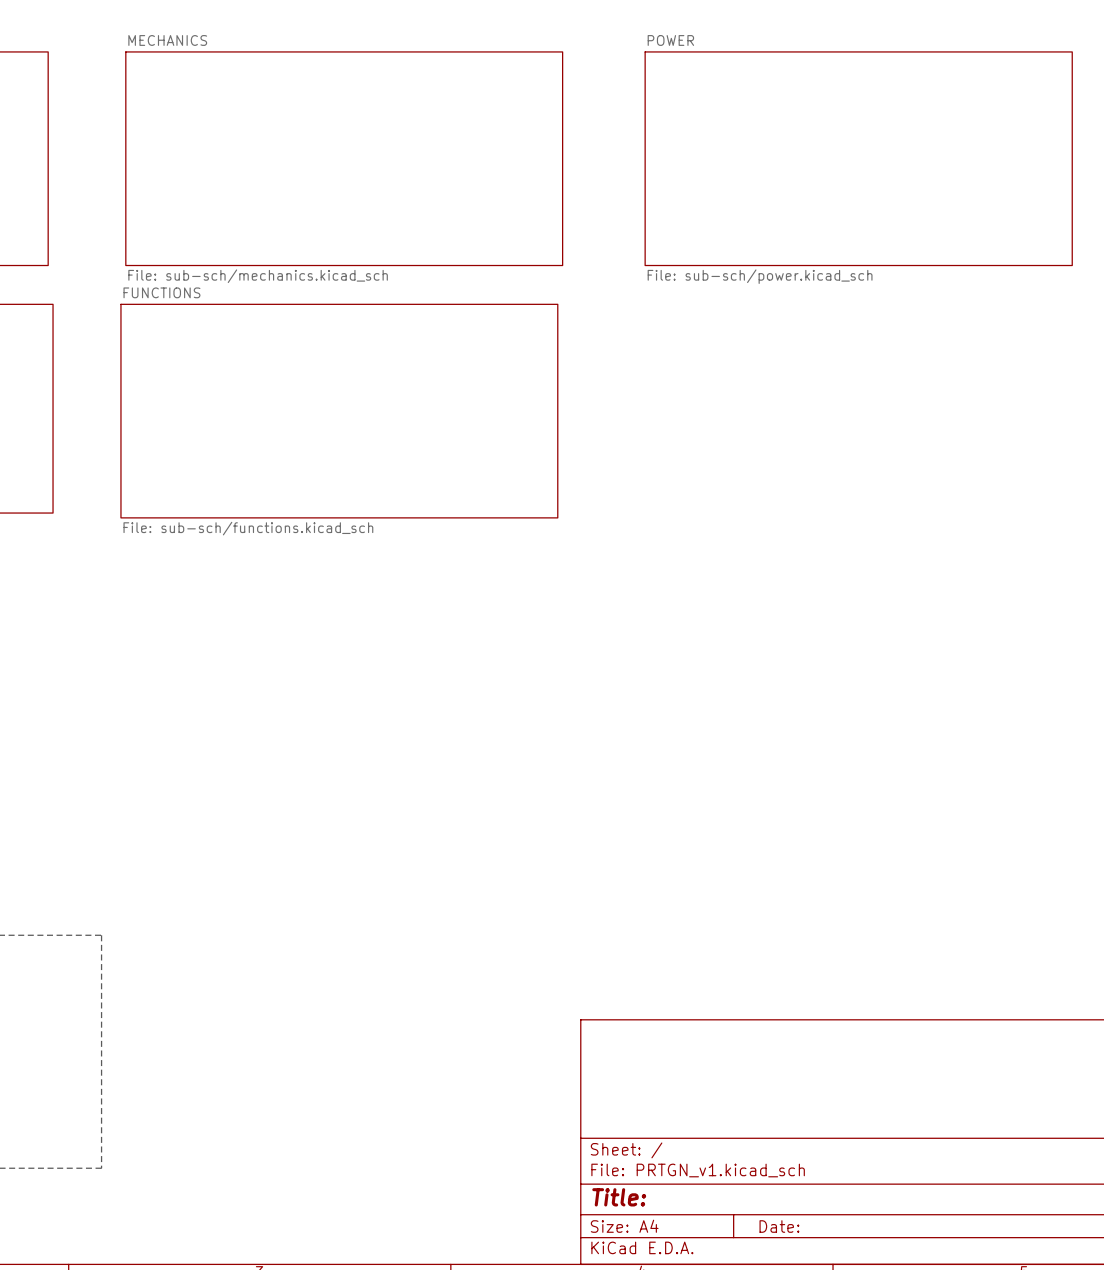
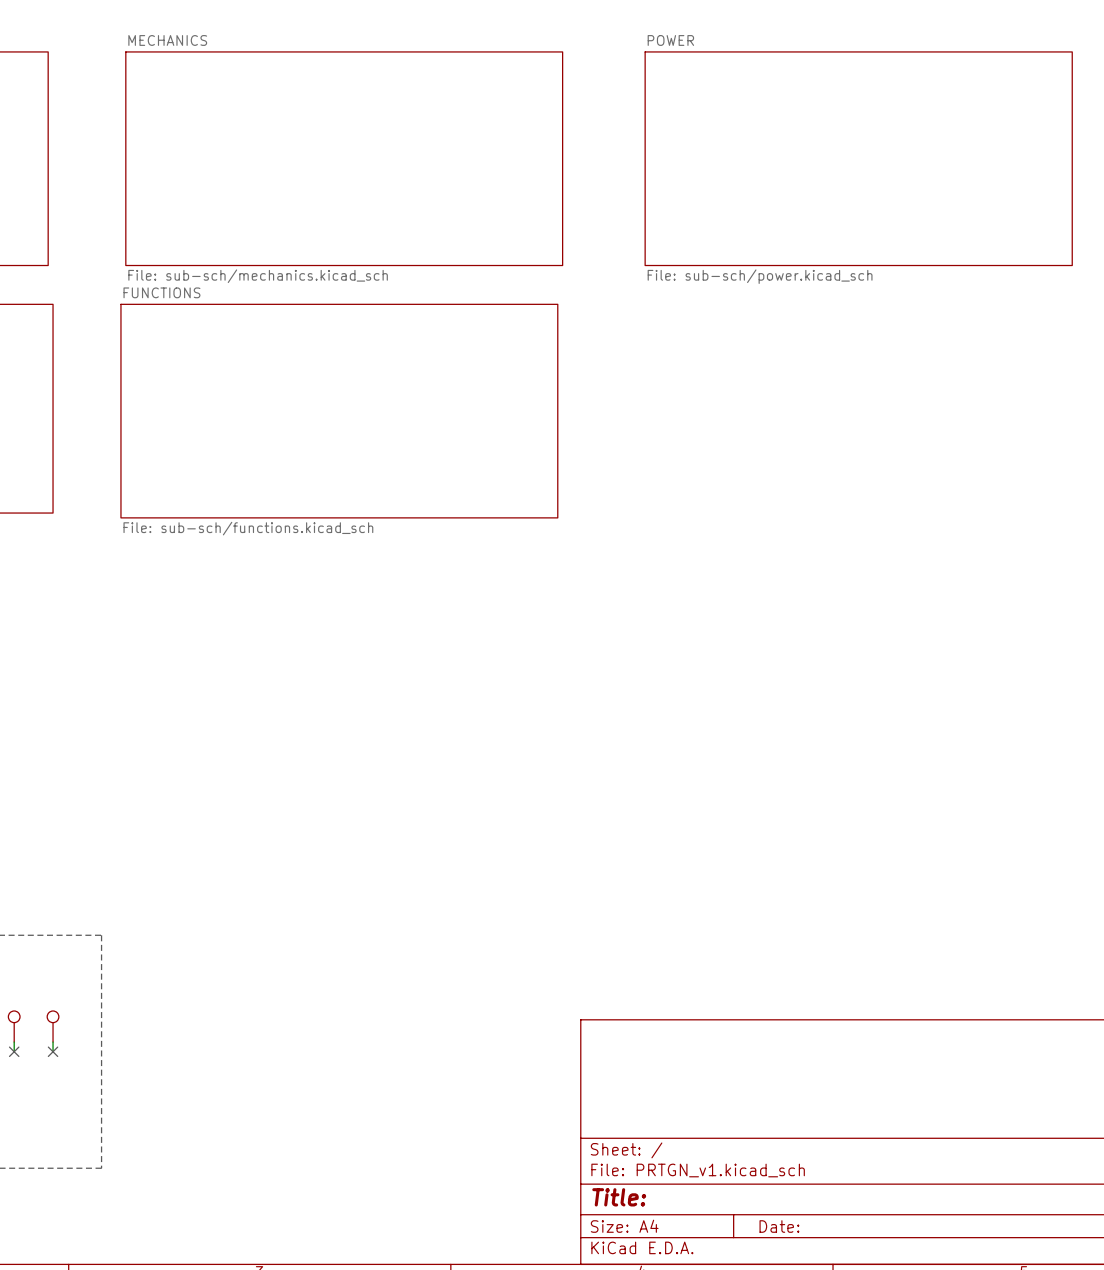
part: none -> (14, 1026)
part: none -> (53, 1026)
wire: none -> (14, 1042) (14, 1051)
wire: none -> (53, 1042) (53, 1051)
no-connect mark: none -> (14, 1051)
no-connect mark: none -> (53, 1051)

